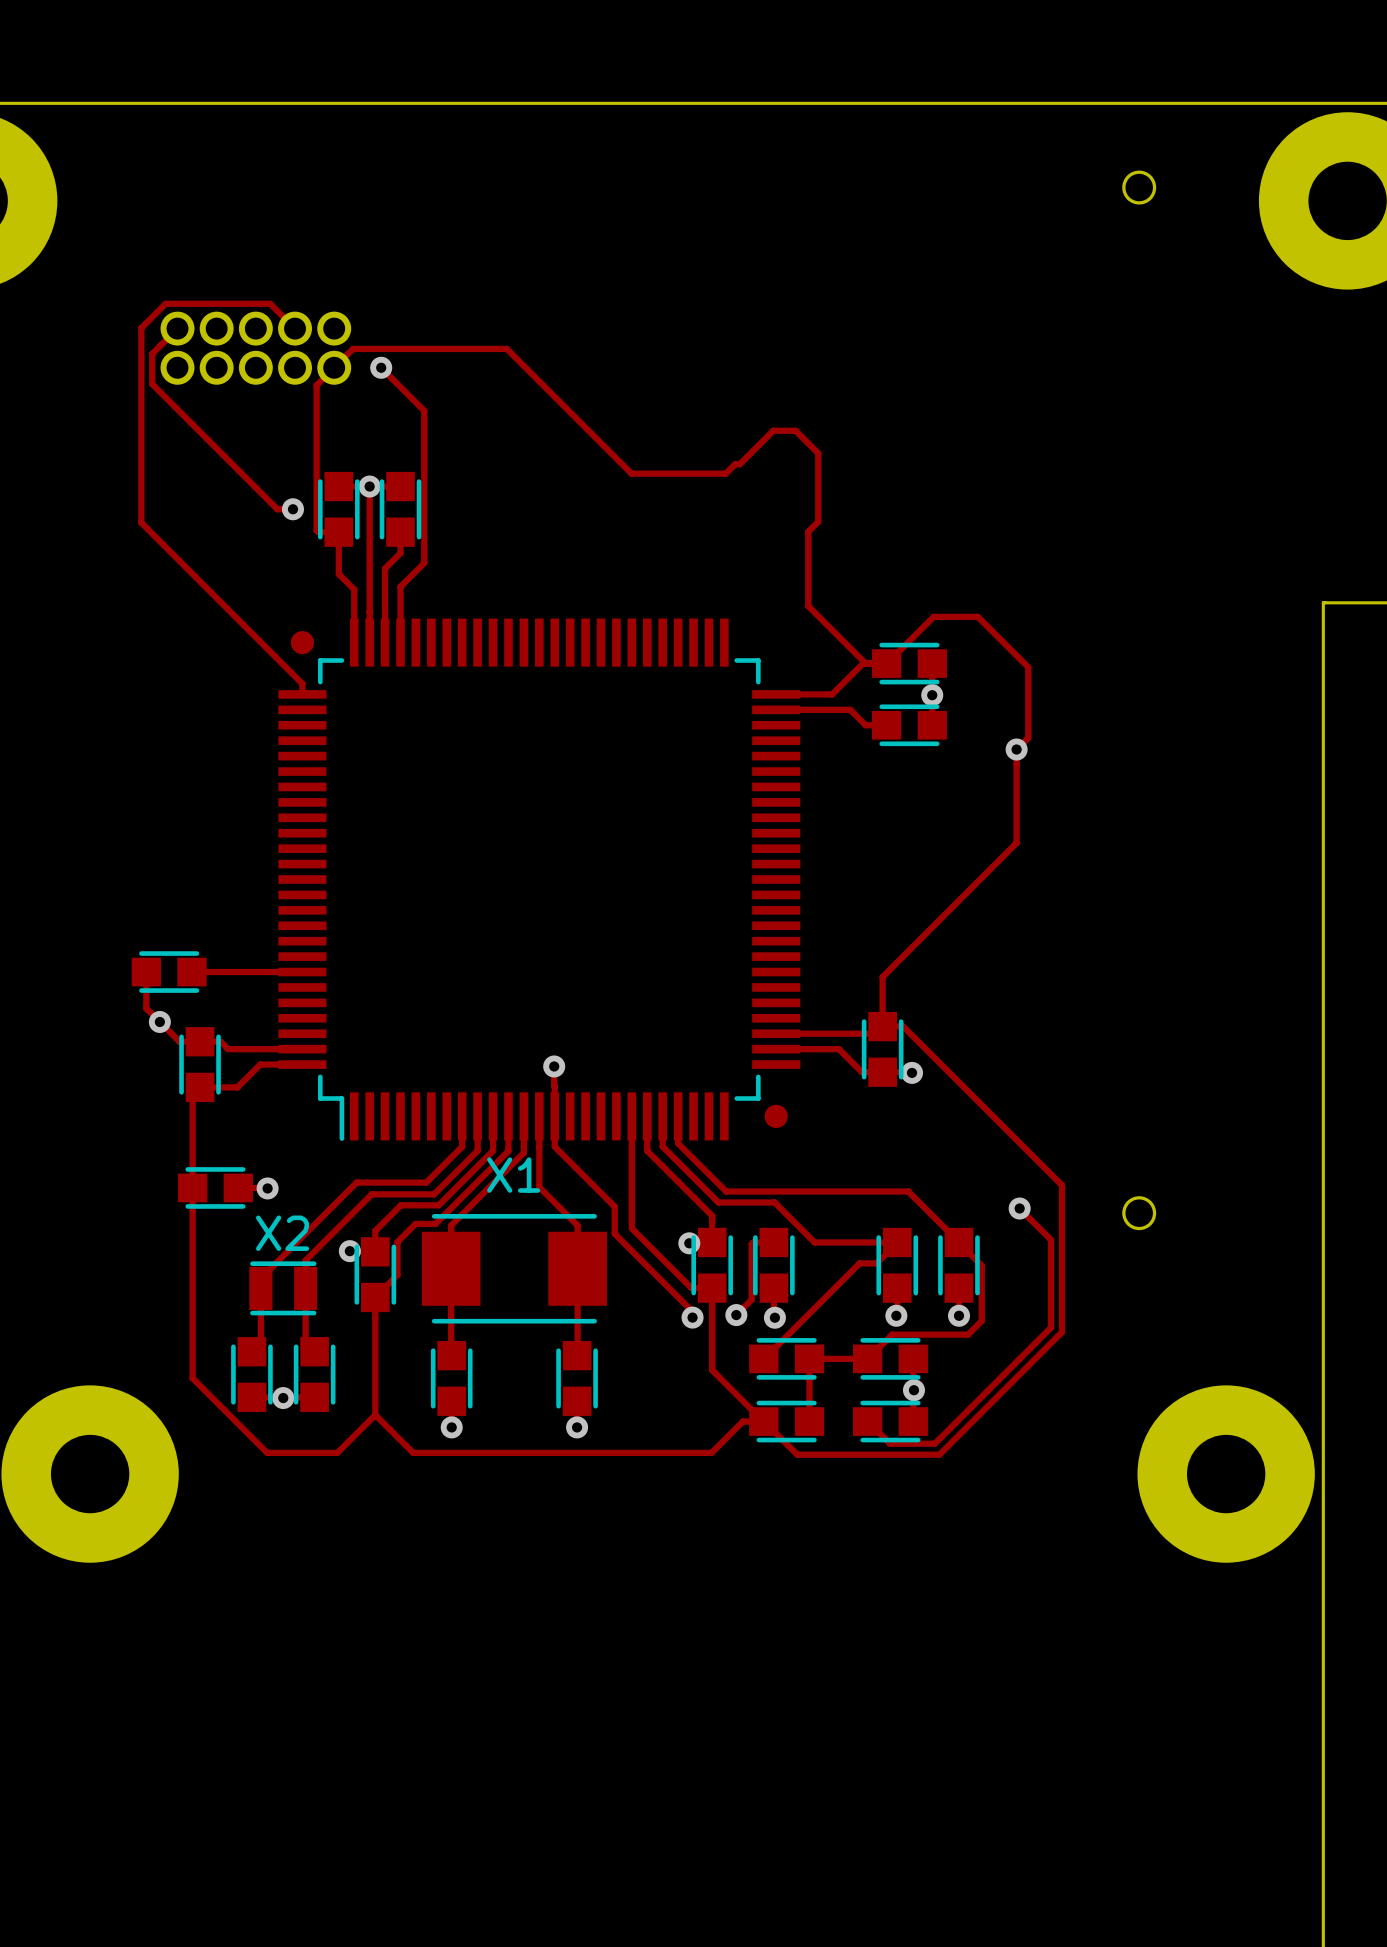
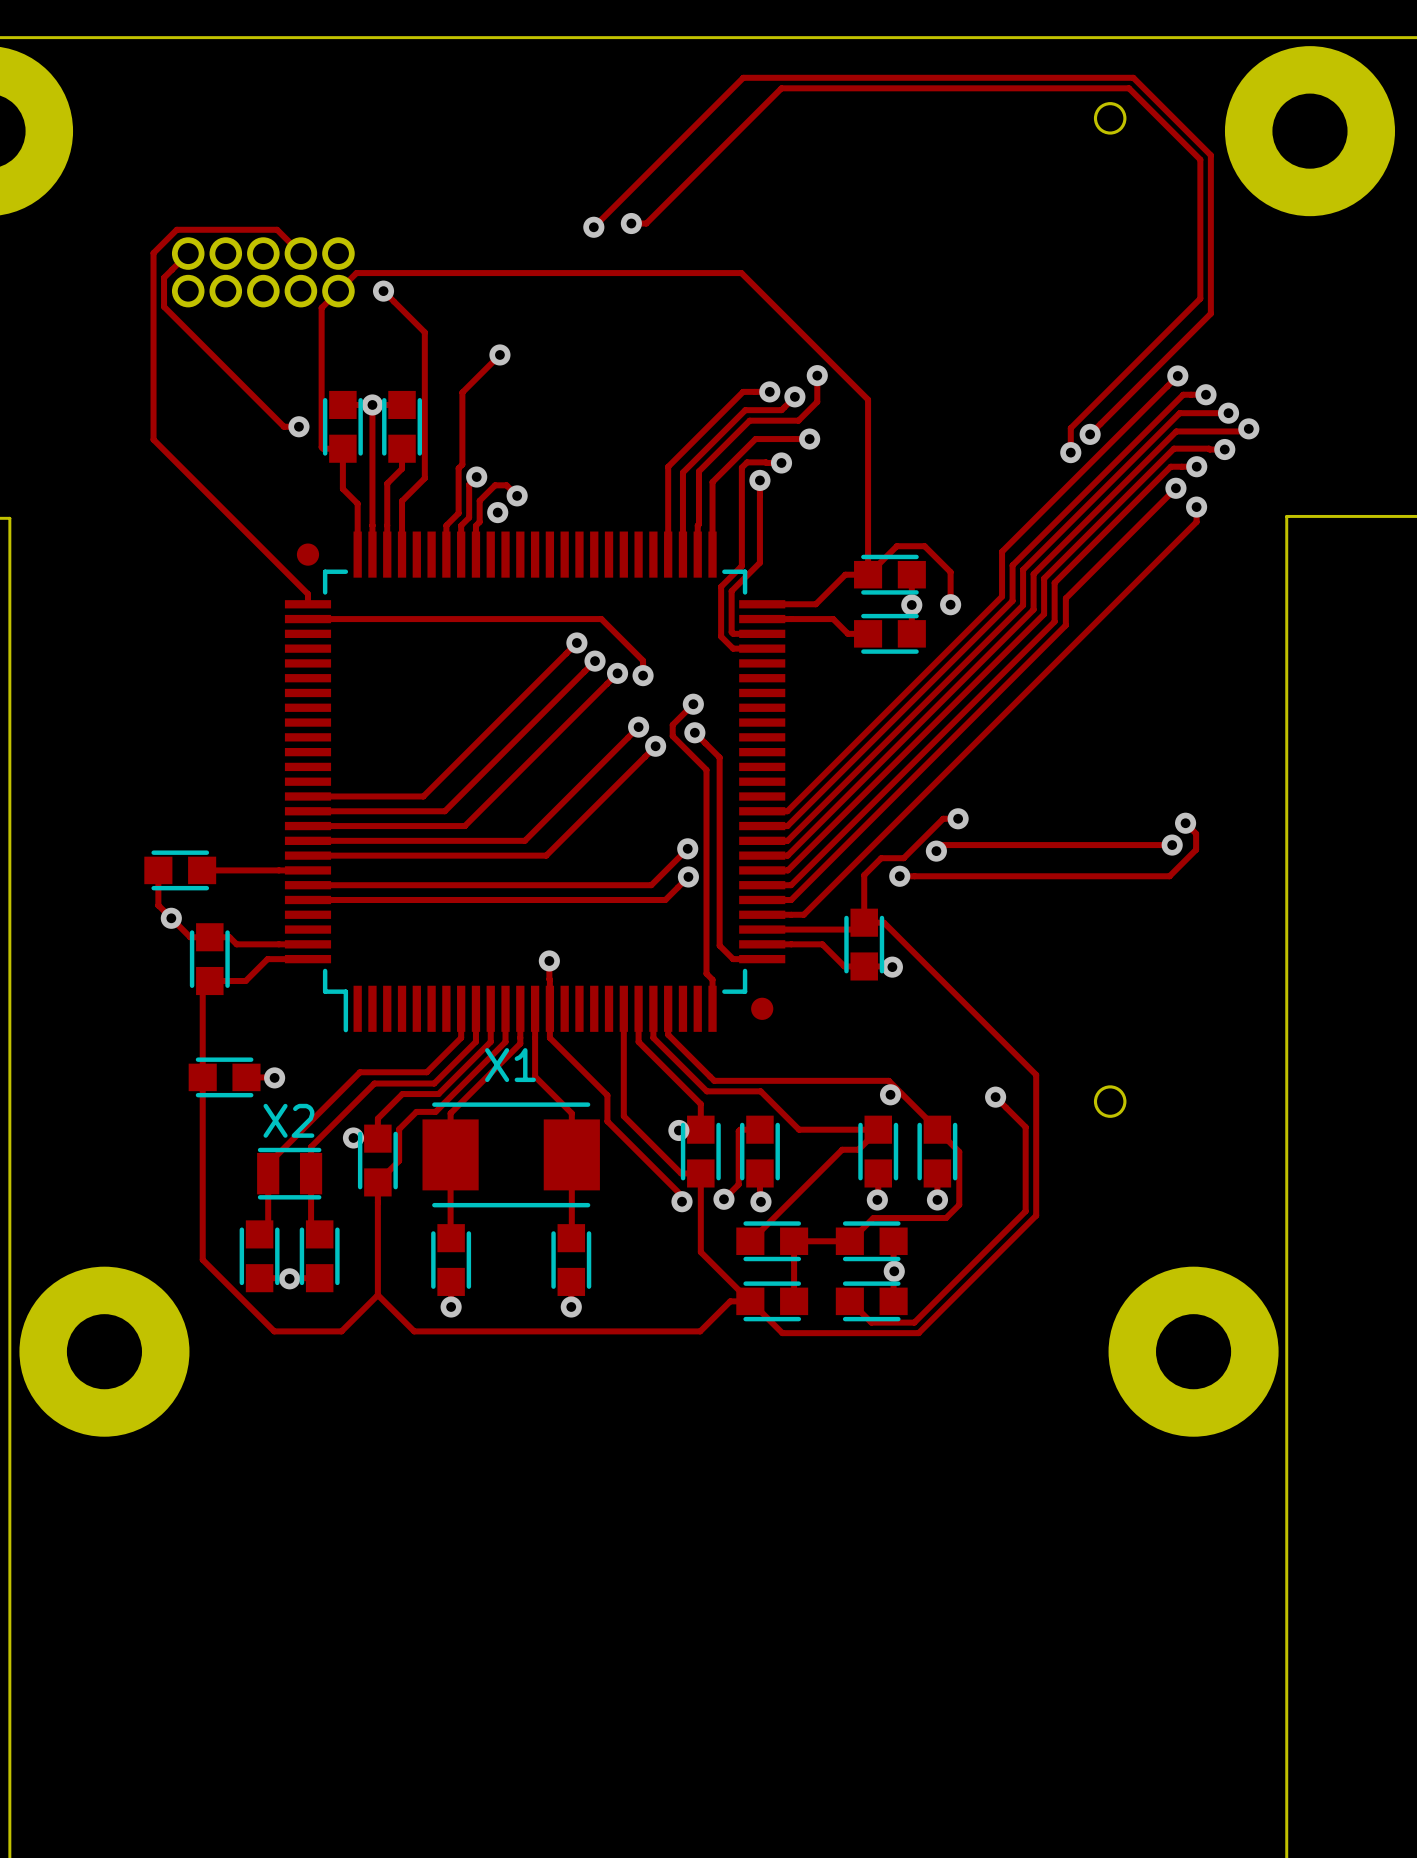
track: none -> (631, 223) (646, 223) (781, 88) (1128, 88) (1200, 159) (1200, 298) (1070, 428) (1070, 452)
via: none -> (631, 223)
track: none -> (593, 227) (743, 77) (1133, 77) (1210, 155) (1210, 313) (1090, 434)
via: none -> (593, 227)
track: (506, 348) (631, 473) (725, 473) (735, 464) (739, 464) (773, 430) (795, 430) (818, 453) (818, 521) (808, 531) (808, 606) (865, 663) -> (503, 273) (741, 273) (868, 399) (868, 574)
track: none -> (499, 354) (462, 392) (462, 464) (458, 468) (458, 513) (446, 525) (446, 554)
via: none -> (499, 354)
track: none -> (817, 375) (817, 401) (798, 420) (749, 420) (698, 471) (697, 554)
via: none -> (817, 375)
track: none -> (1177, 375) (1002, 551) (1002, 596) (787, 811) (762, 811)
via: none -> (1177, 375)
track: none -> (769, 391) (743, 391) (668, 466) (668, 554)
via: none -> (769, 391)
track: none -> (1205, 394) (1183, 394) (1012, 565) (1012, 600) (787, 826) (762, 826)
via: none -> (1205, 394)
track: none -> (794, 396) (781, 410) (745, 410) (682, 472) (682, 554)
via: none -> (794, 396)
track: none -> (1228, 413) (1179, 413) (1023, 569) (1023, 605) (787, 840) (762, 840)
via: none -> (1228, 413)
track: none -> (1248, 428) (1246, 431) (1176, 431) (1033, 574) (1033, 609) (787, 855) (762, 855)
via: none -> (1248, 428)
via: none -> (1090, 434)
track: none -> (809, 439) (755, 439) (712, 482) (712, 554)
via: none -> (809, 439)
track: none -> (1224, 449) (1173, 448) (1044, 578) (1044, 614) (787, 870) (762, 870)
via: none -> (1224, 449)
via: none -> (1070, 452)
track: none -> (781, 462) (747, 462) (741, 467) (741, 565) (721, 586) (721, 636) (733, 648) (762, 648)
via: none -> (781, 462)
track: none -> (1196, 466) (1170, 466) (1054, 582) (1054, 621) (791, 885) (762, 885)
via: none -> (1196, 466)
track: none -> (476, 477) (469, 484) (469, 517) (461, 525) (461, 554)
via: none -> (476, 477)
track: none -> (759, 480) (759, 562) (731, 591) (731, 632) (733, 633) (762, 633)
via: none -> (759, 480)
track: none -> (1175, 488) (1065, 598) (1065, 625) (791, 899) (762, 899)
via: none -> (1175, 488)
track: none -> (517, 495) (506, 485) (495, 485) (479, 500) (479, 521) (475, 525) (475, 554)
via: none -> (517, 495)
track: none -> (1196, 507) (1196, 521) (803, 914) (762, 914)
via: none -> (1196, 507)
via: none -> (497, 512)
track: (916, 633) (933, 616) (977, 616) (1028, 667) (1028, 737) (1016, 749) (1016, 843) (900, 959) -> (896, 546) (924, 546) (950, 572) (950, 604)
track: none -> (307, 619) (601, 619) (643, 660) (643, 675)
track: none -> (576, 642) (423, 796) (307, 796)
via: none -> (576, 642)
via position: (1016, 749) -> (950, 604)
track: none -> (595, 661) (444, 811) (307, 811)
via: none -> (595, 661)
track: none -> (617, 673) (464, 826) (307, 826)
via: none -> (617, 673)
via: none -> (643, 675)
track: none -> (693, 704) (672, 724) (672, 736) (706, 769) (706, 973) (712, 979) (712, 1008)
via: none -> (693, 704)
track: none -> (638, 727) (524, 840) (307, 840)
via: none -> (638, 727)
track: none -> (694, 732) (719, 757) (719, 945) (733, 959) (762, 959)
via: none -> (694, 732)
track: none -> (655, 746) (546, 855) (307, 855)
via: none -> (655, 746)
track: none -> (958, 818) (943, 818) (903, 858) (881, 858)
via: none -> (958, 818)
track: none -> (1185, 823) (1196, 833) (1196, 849) (1169, 876) (899, 876)
via: none -> (1185, 823)
track: none -> (1172, 845) (942, 845) (936, 851)
via: none -> (1172, 845)
track: none -> (687, 848) (651, 885) (307, 885)
via: none -> (687, 848)
via: none -> (936, 851)
track: none -> (688, 876) (665, 899) (307, 899)
via: none -> (688, 876)
via: none -> (899, 876)
via: none -> (890, 1094)

